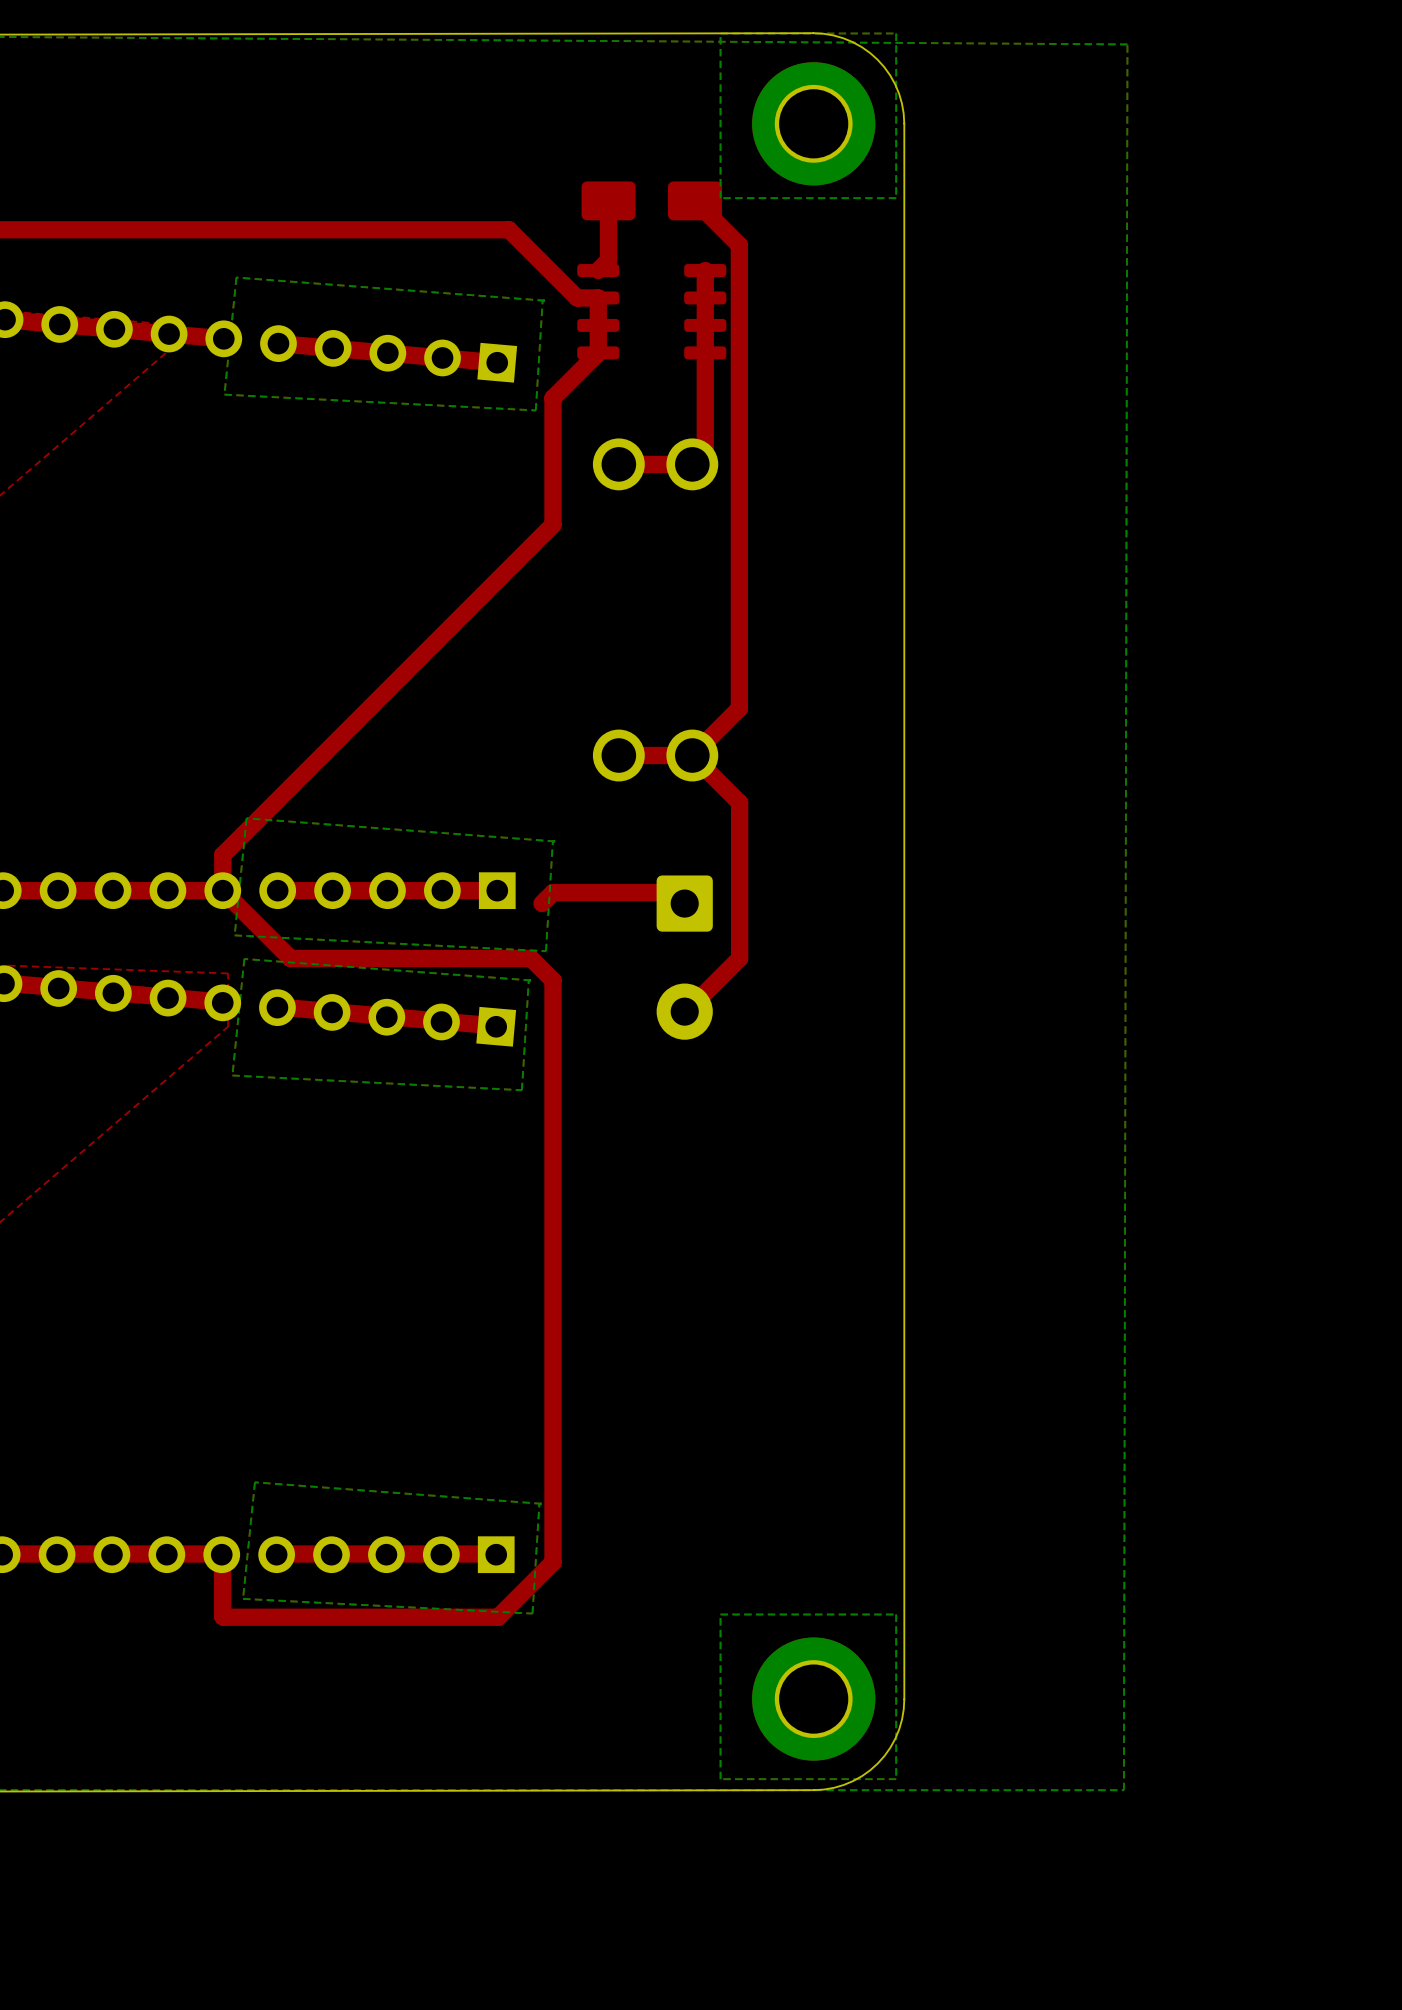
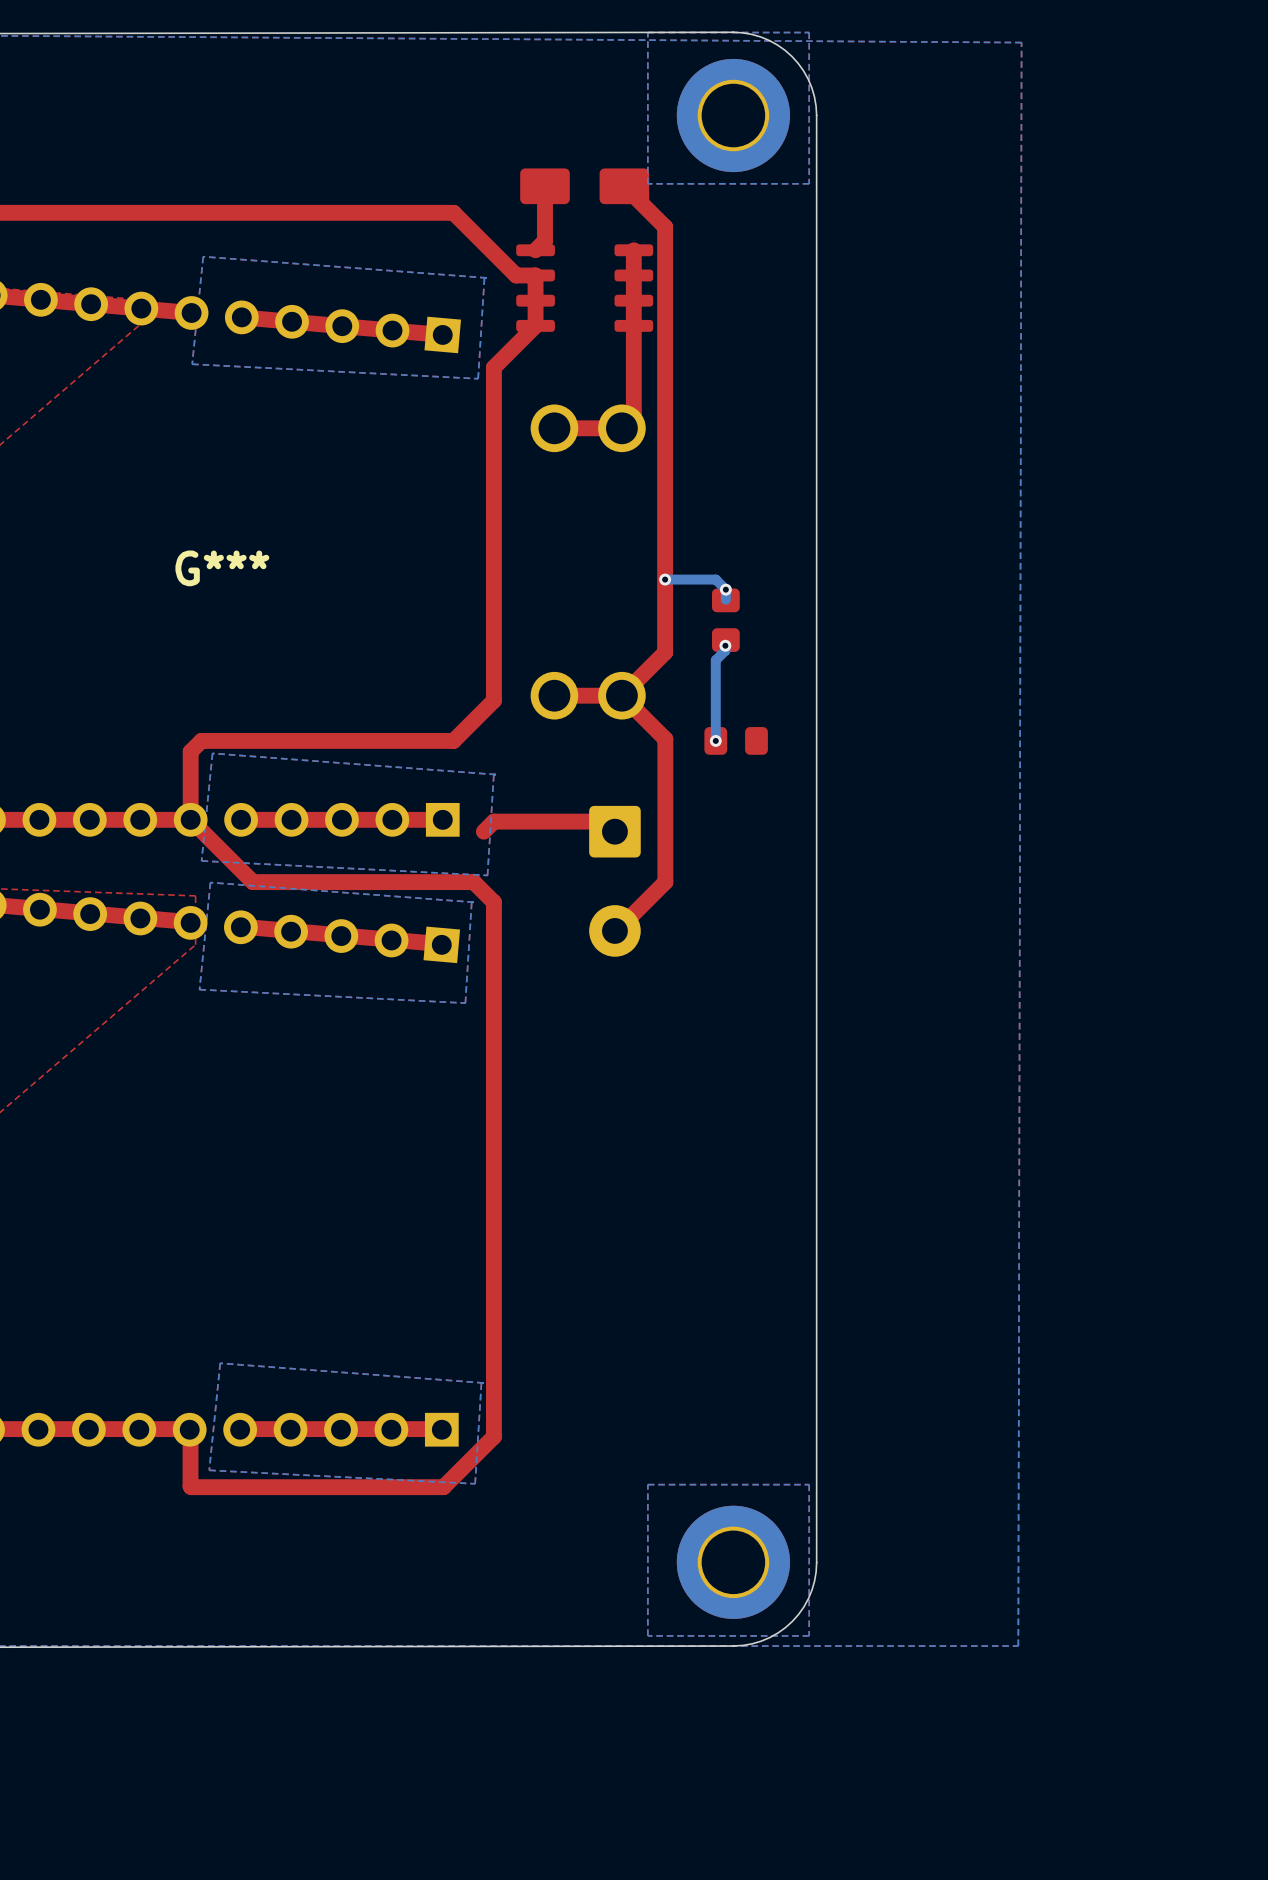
top track: (552, 524) (222, 854) -> (493, 483) (493, 700) (453, 740) (201, 740) (190, 751) (190, 787)
G***: none -> (222, 568)
bottom track: none -> (665, 579) (715, 579) (725, 589) (725, 599)
via: none -> (665, 579)
via: none -> (725, 589)
part: none -> (725, 620)
bottom track: none -> (725, 645) (725, 650) (715, 660) (715, 740)
via: none -> (725, 645)
via: none -> (715, 740)
part: none -> (736, 740)

